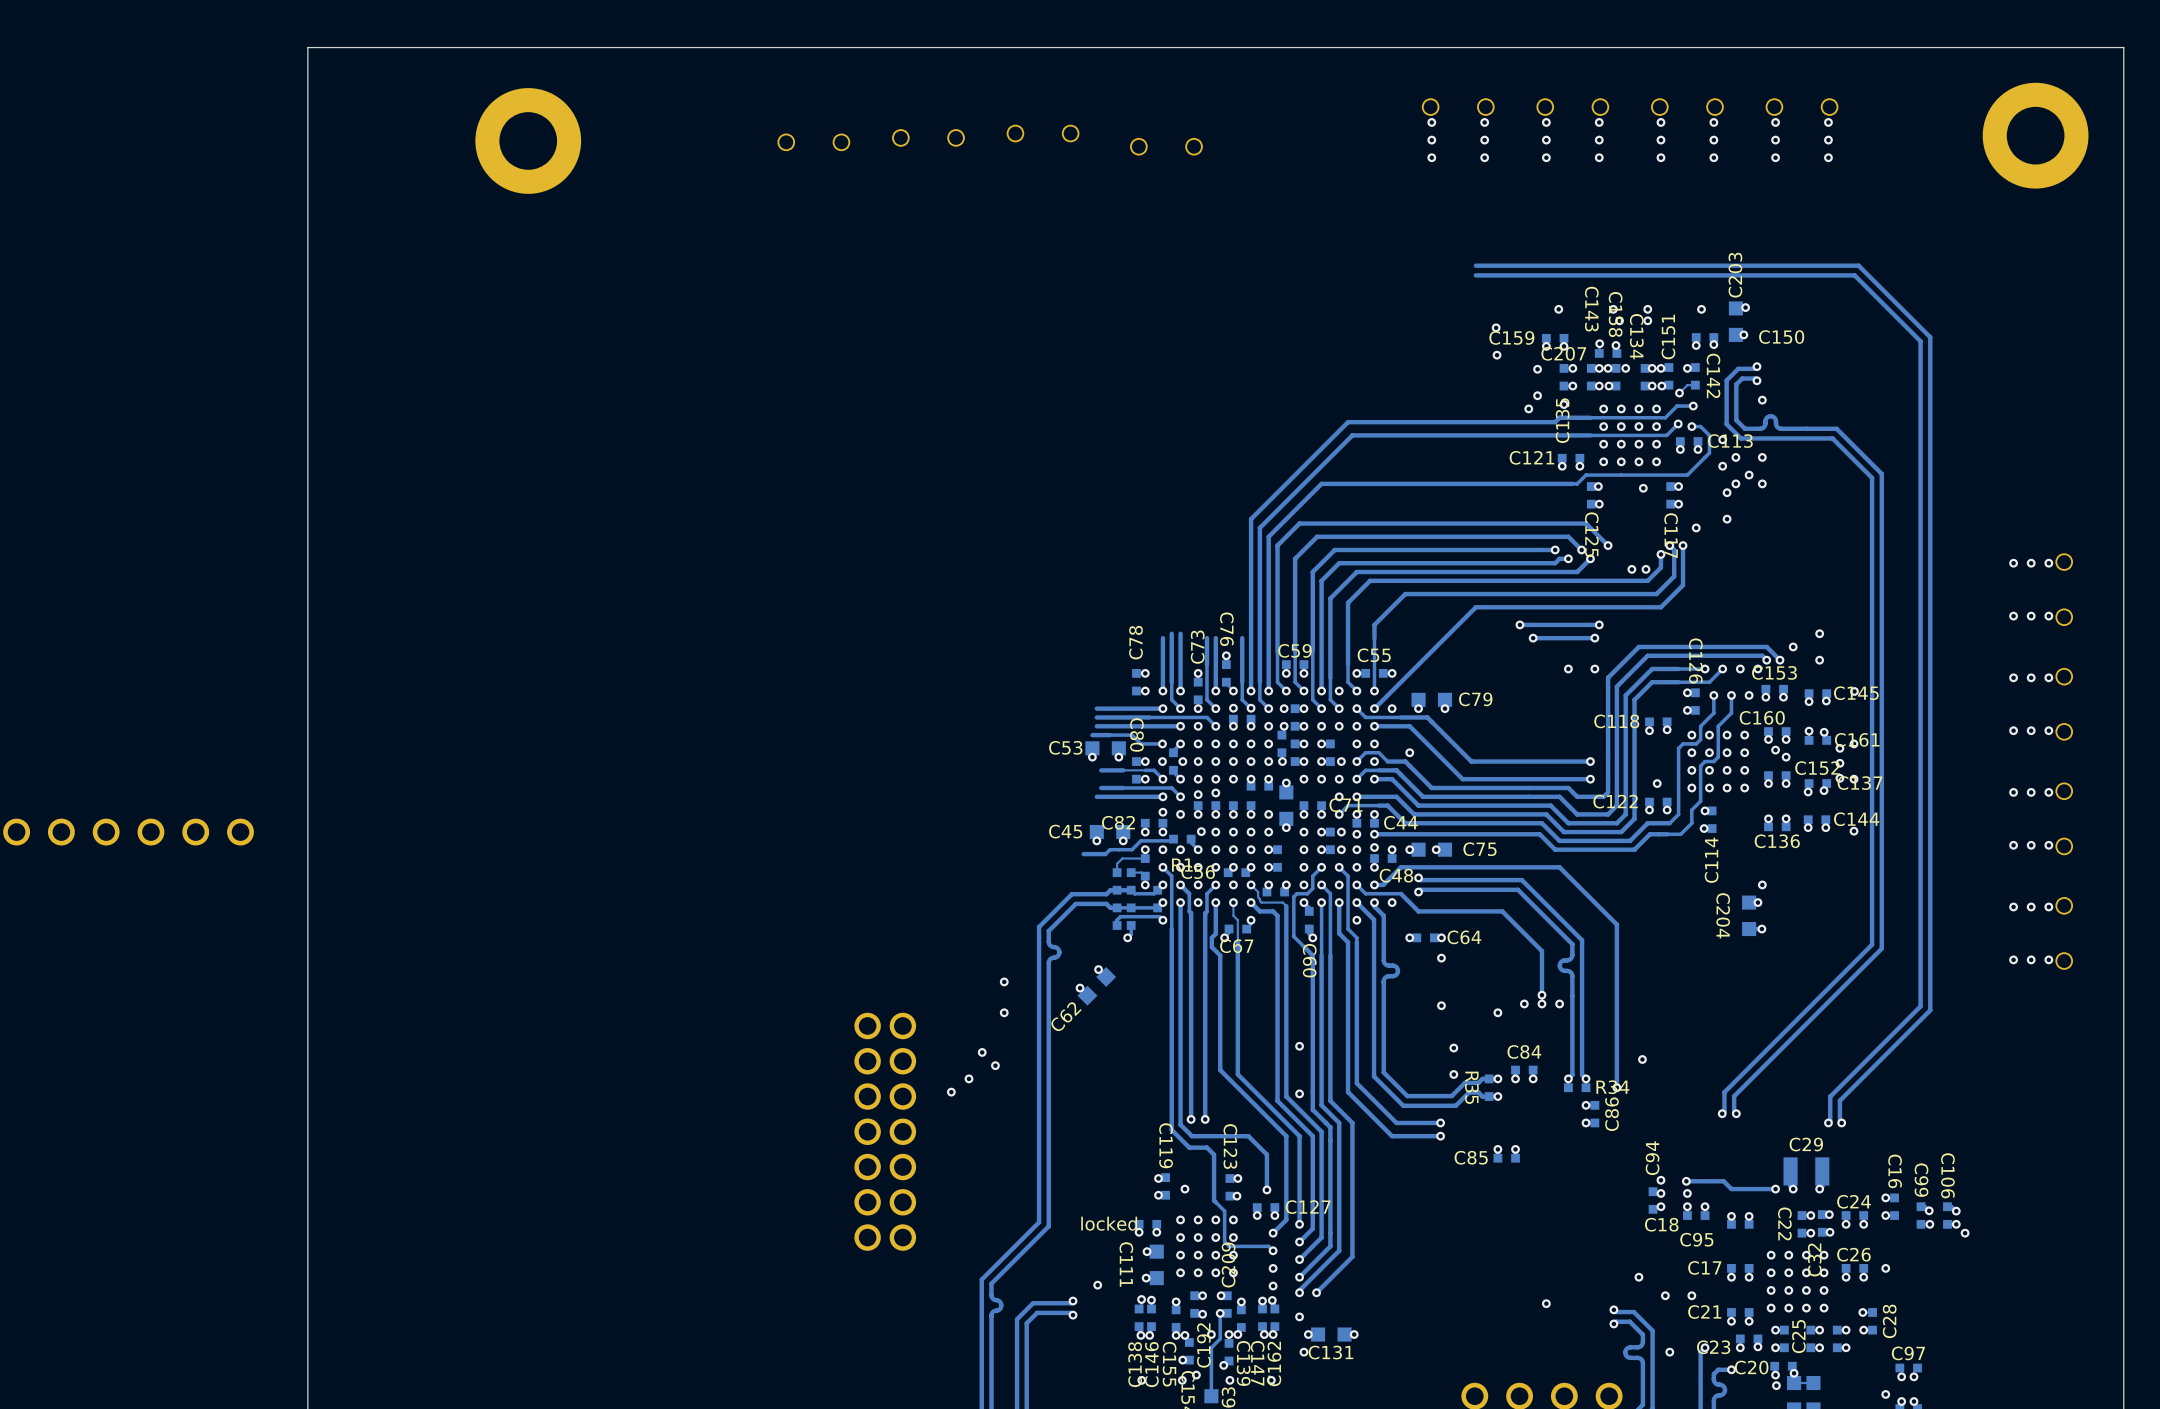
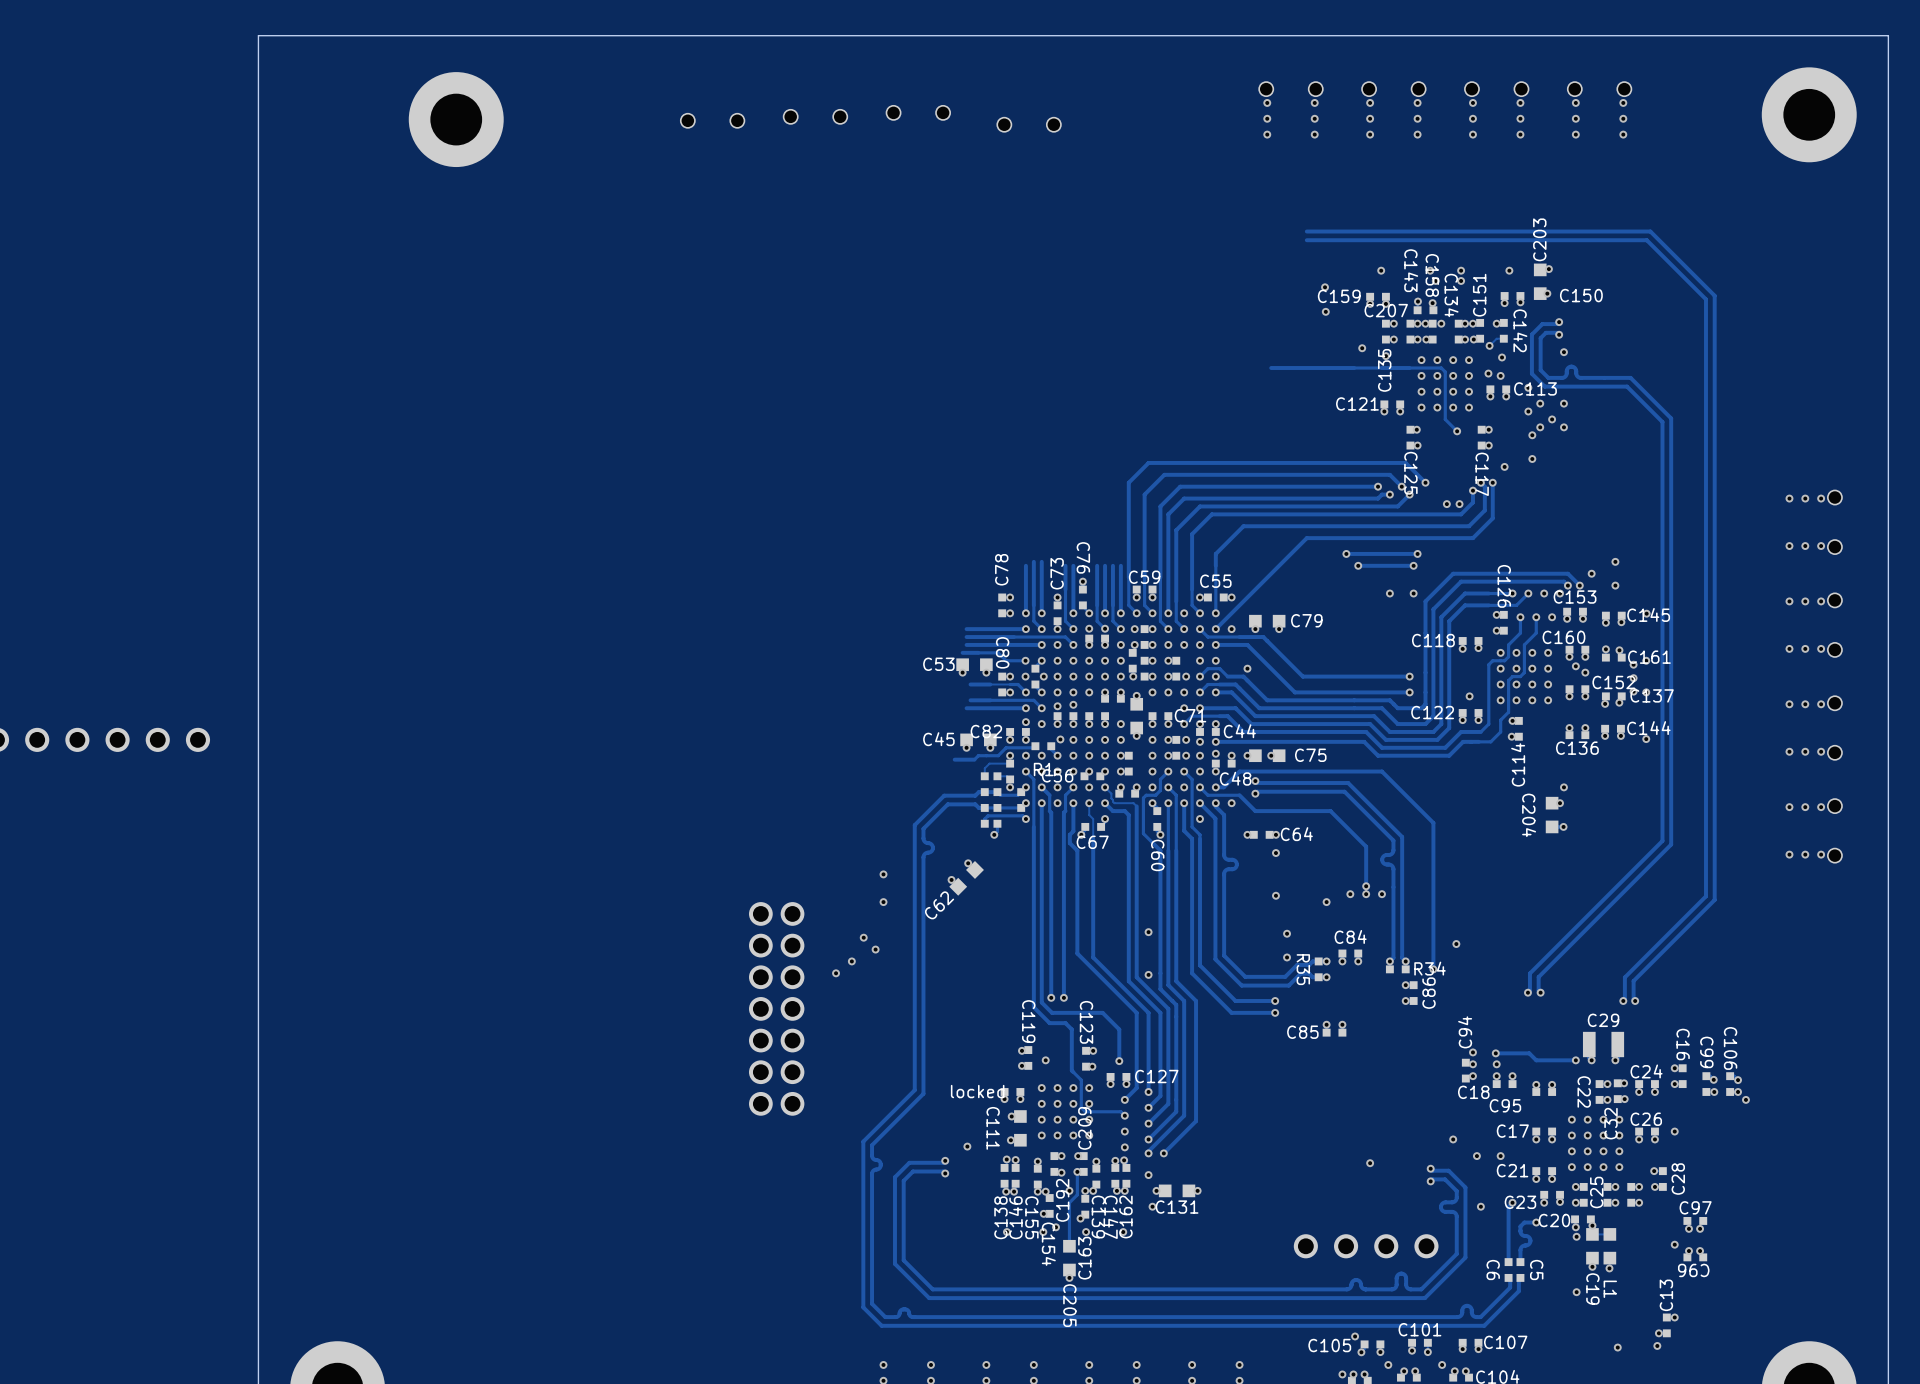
via: (1537, 369) -> none
track: (1693, 406) (1677, 406) (1665, 417) (1625, 417) -> (1457, 431) (1445, 419) (1445, 371) (1441, 368)
via: (1528, 408) -> none
track: (1559, 417) (1555, 422) (1348, 422) (1251, 519) (1251, 638) -> (1381, 368) (1271, 368)
track: (1678, 423) (1666, 435) (1352, 435) (1259, 527) (1259, 638) -> none
track: (1691, 426) (1700, 426) (1709, 435) (1709, 453) (1687, 475) (1586, 475) (1577, 483) (1321, 483) (1268, 536) (1268, 638) -> none

